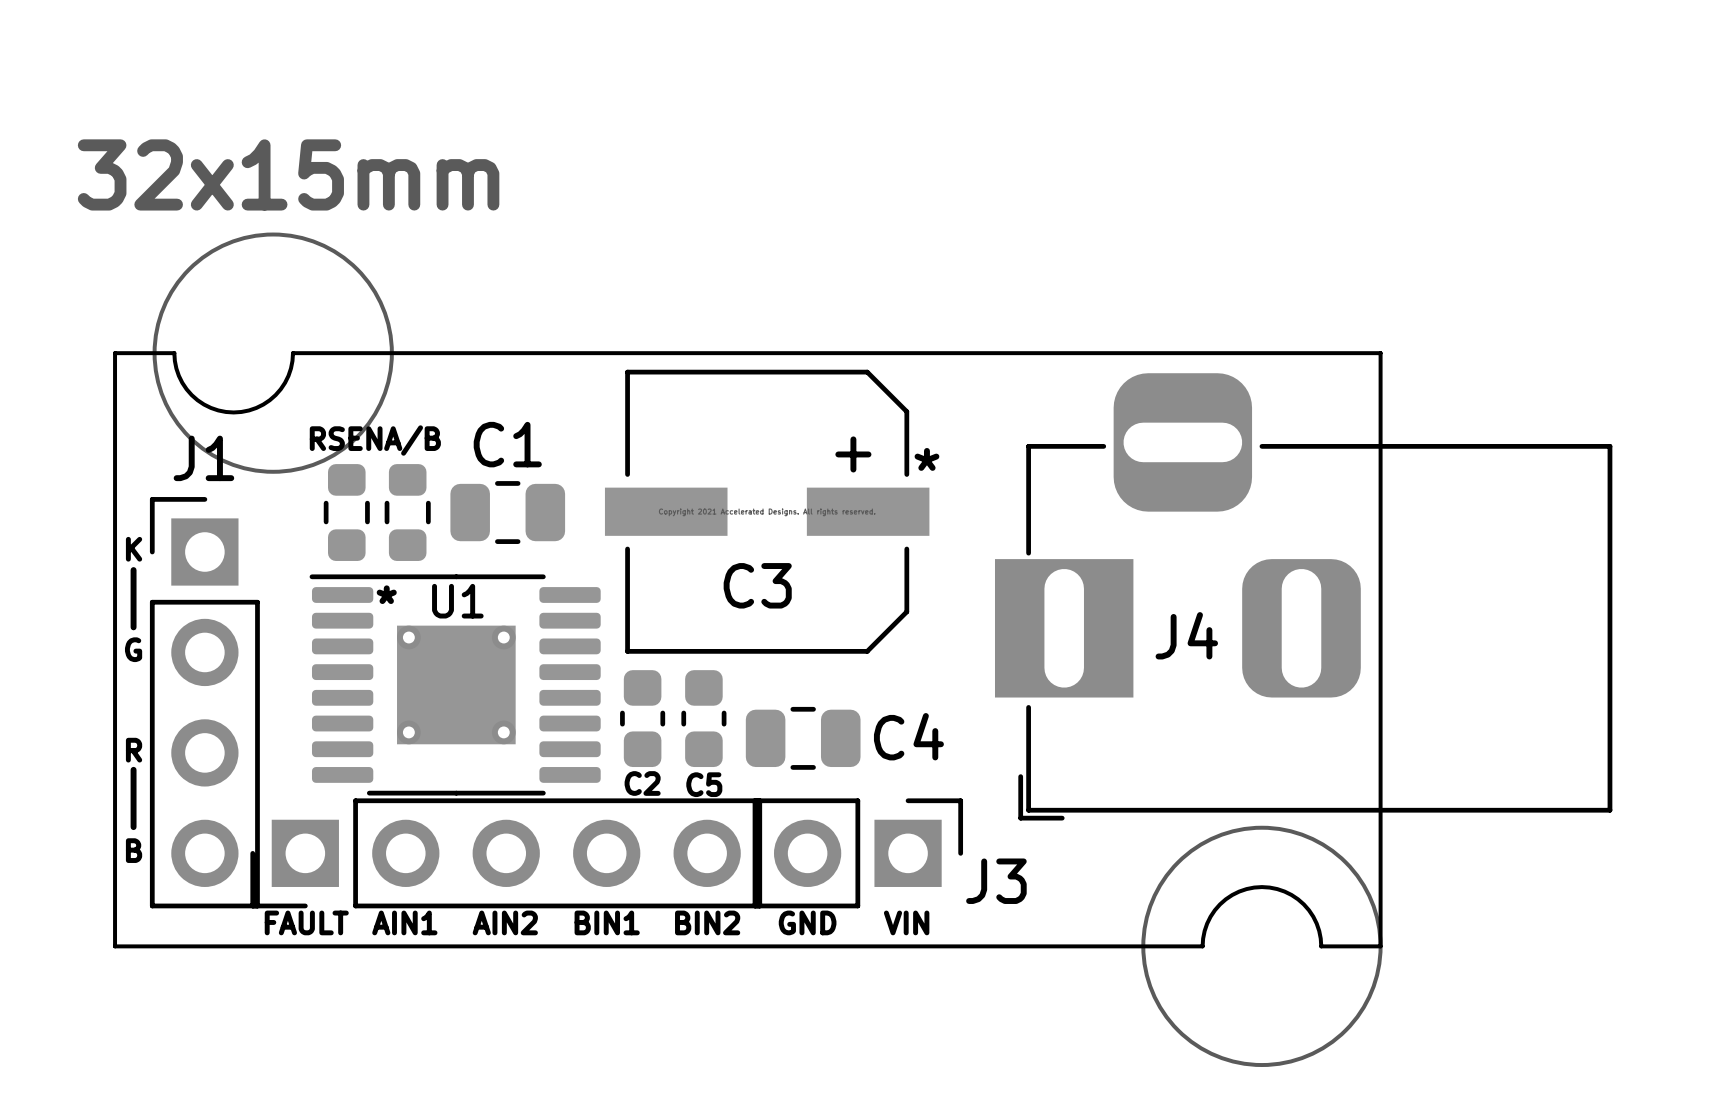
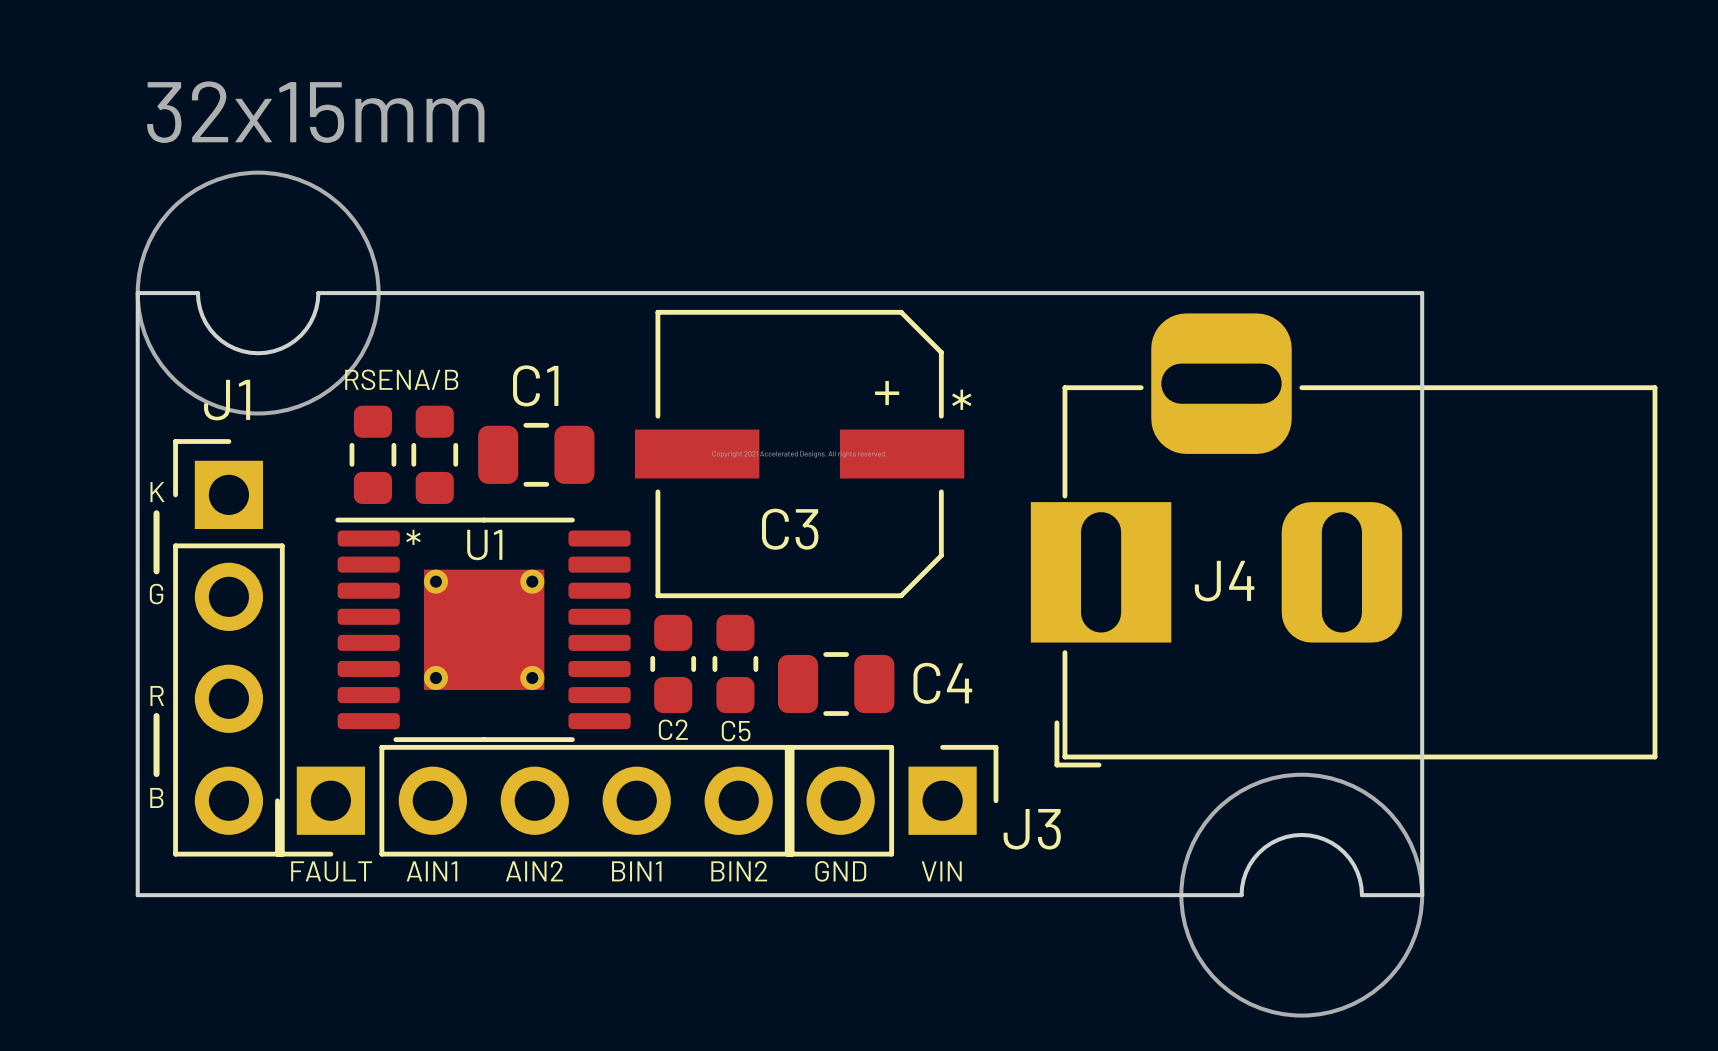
drawing position: (273, 353) -> (258, 293)

